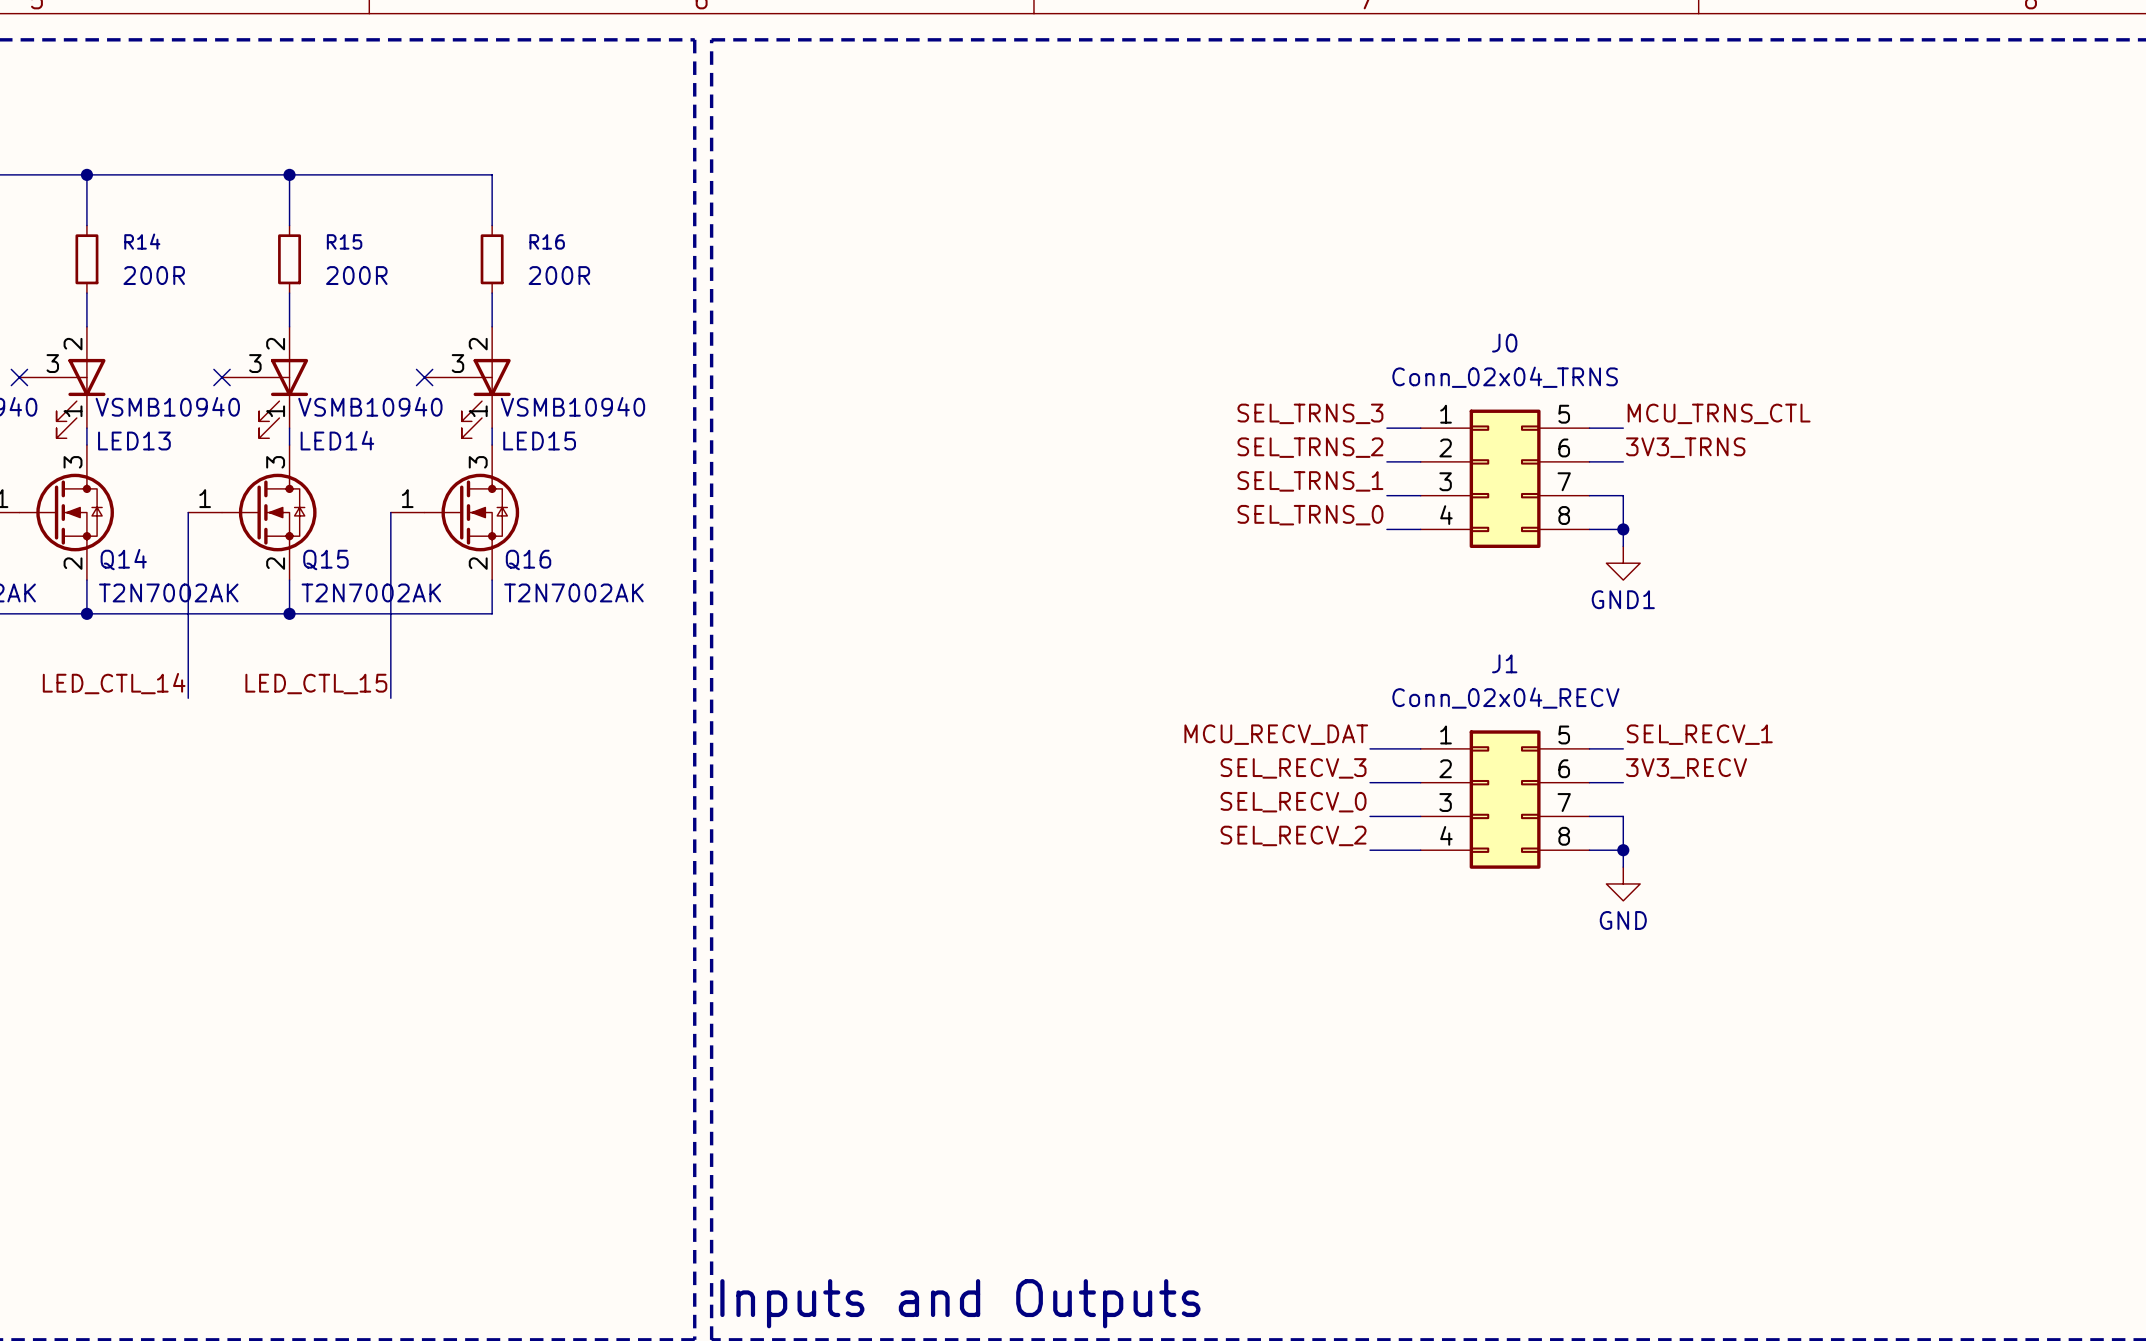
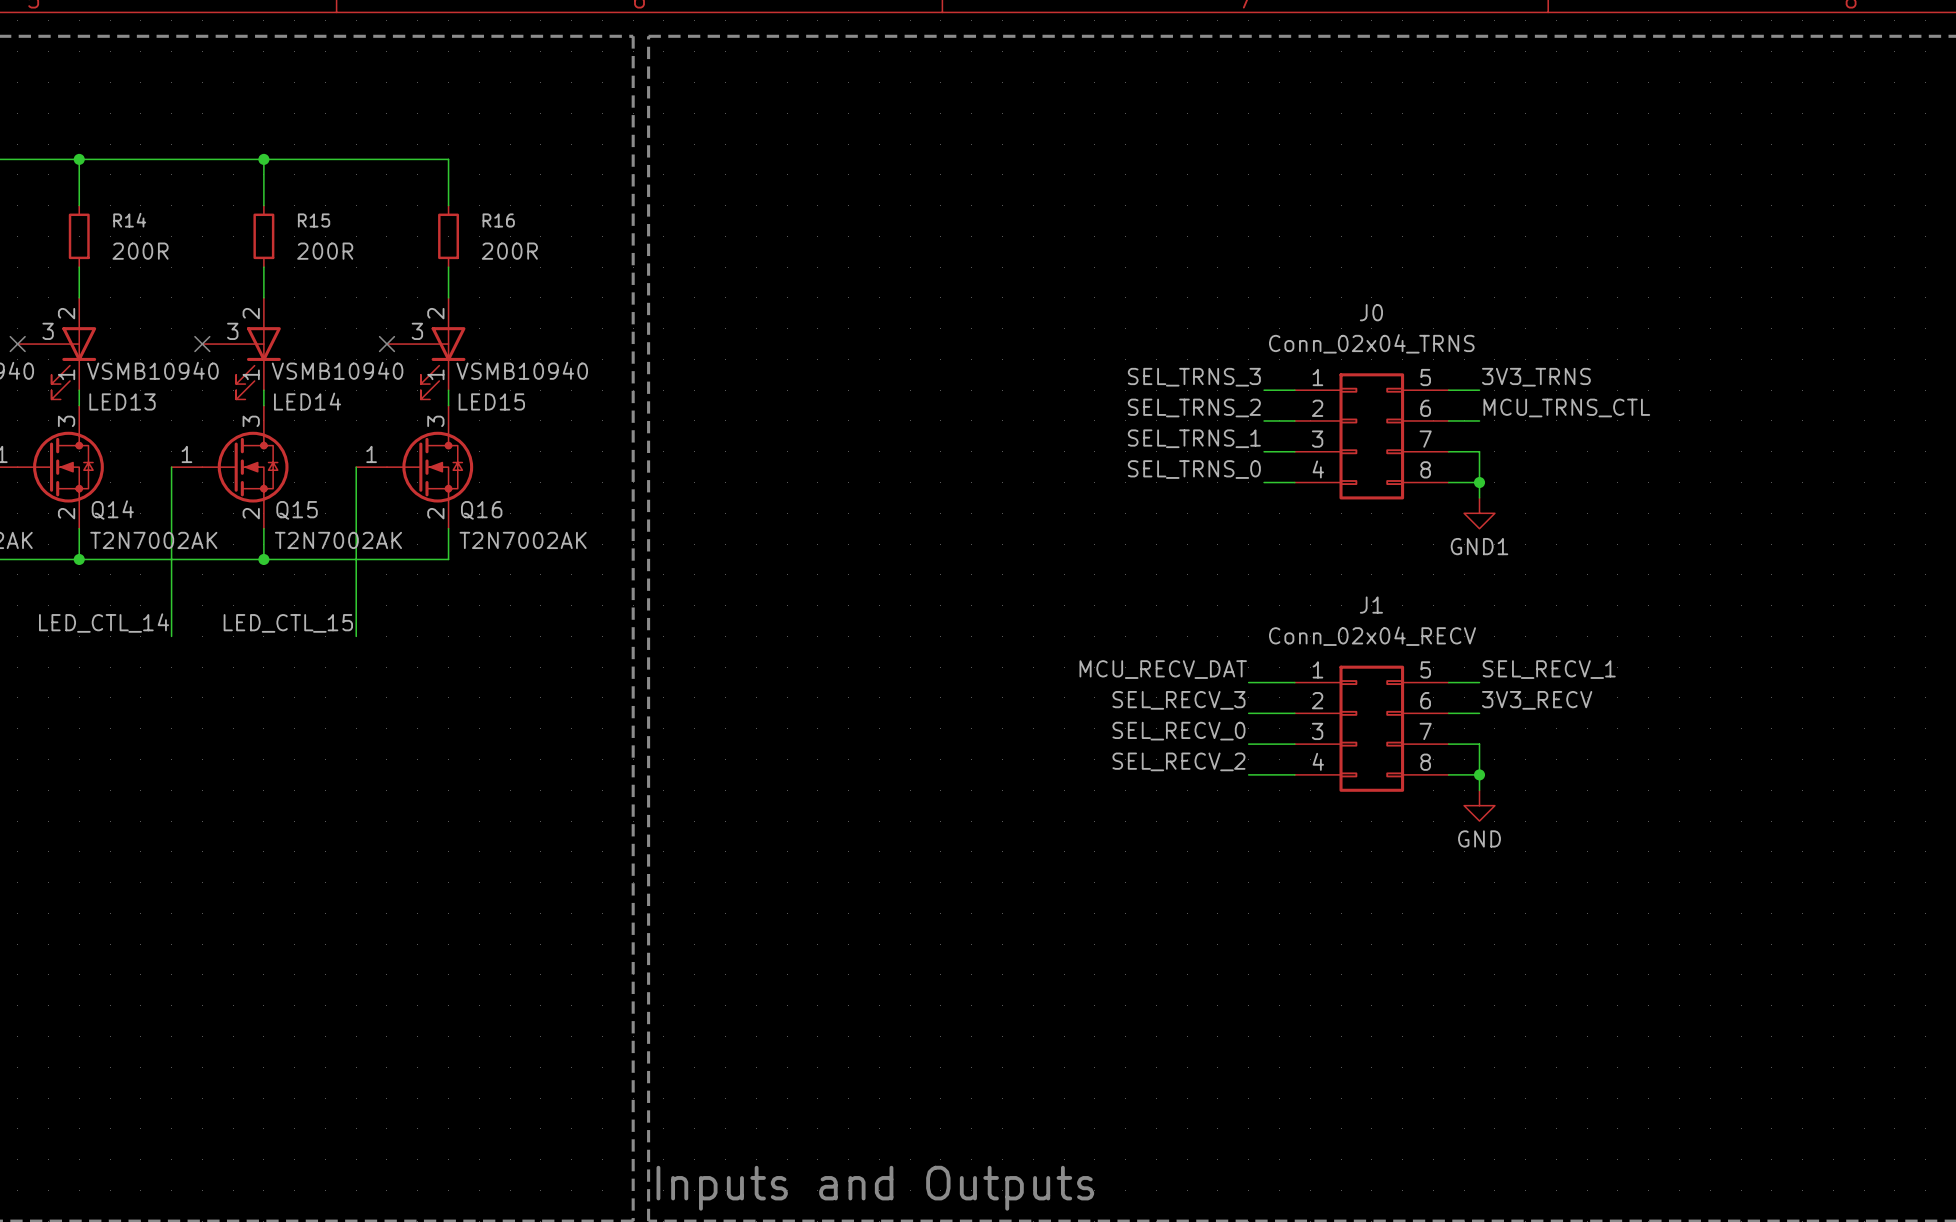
label: MCU_TRNS_CTL (1719, 413) -> 3V3_TRNS (1536, 377)
label: 3V3_TRNS (1685, 447) -> MCU_TRNS_CTL (1566, 407)

